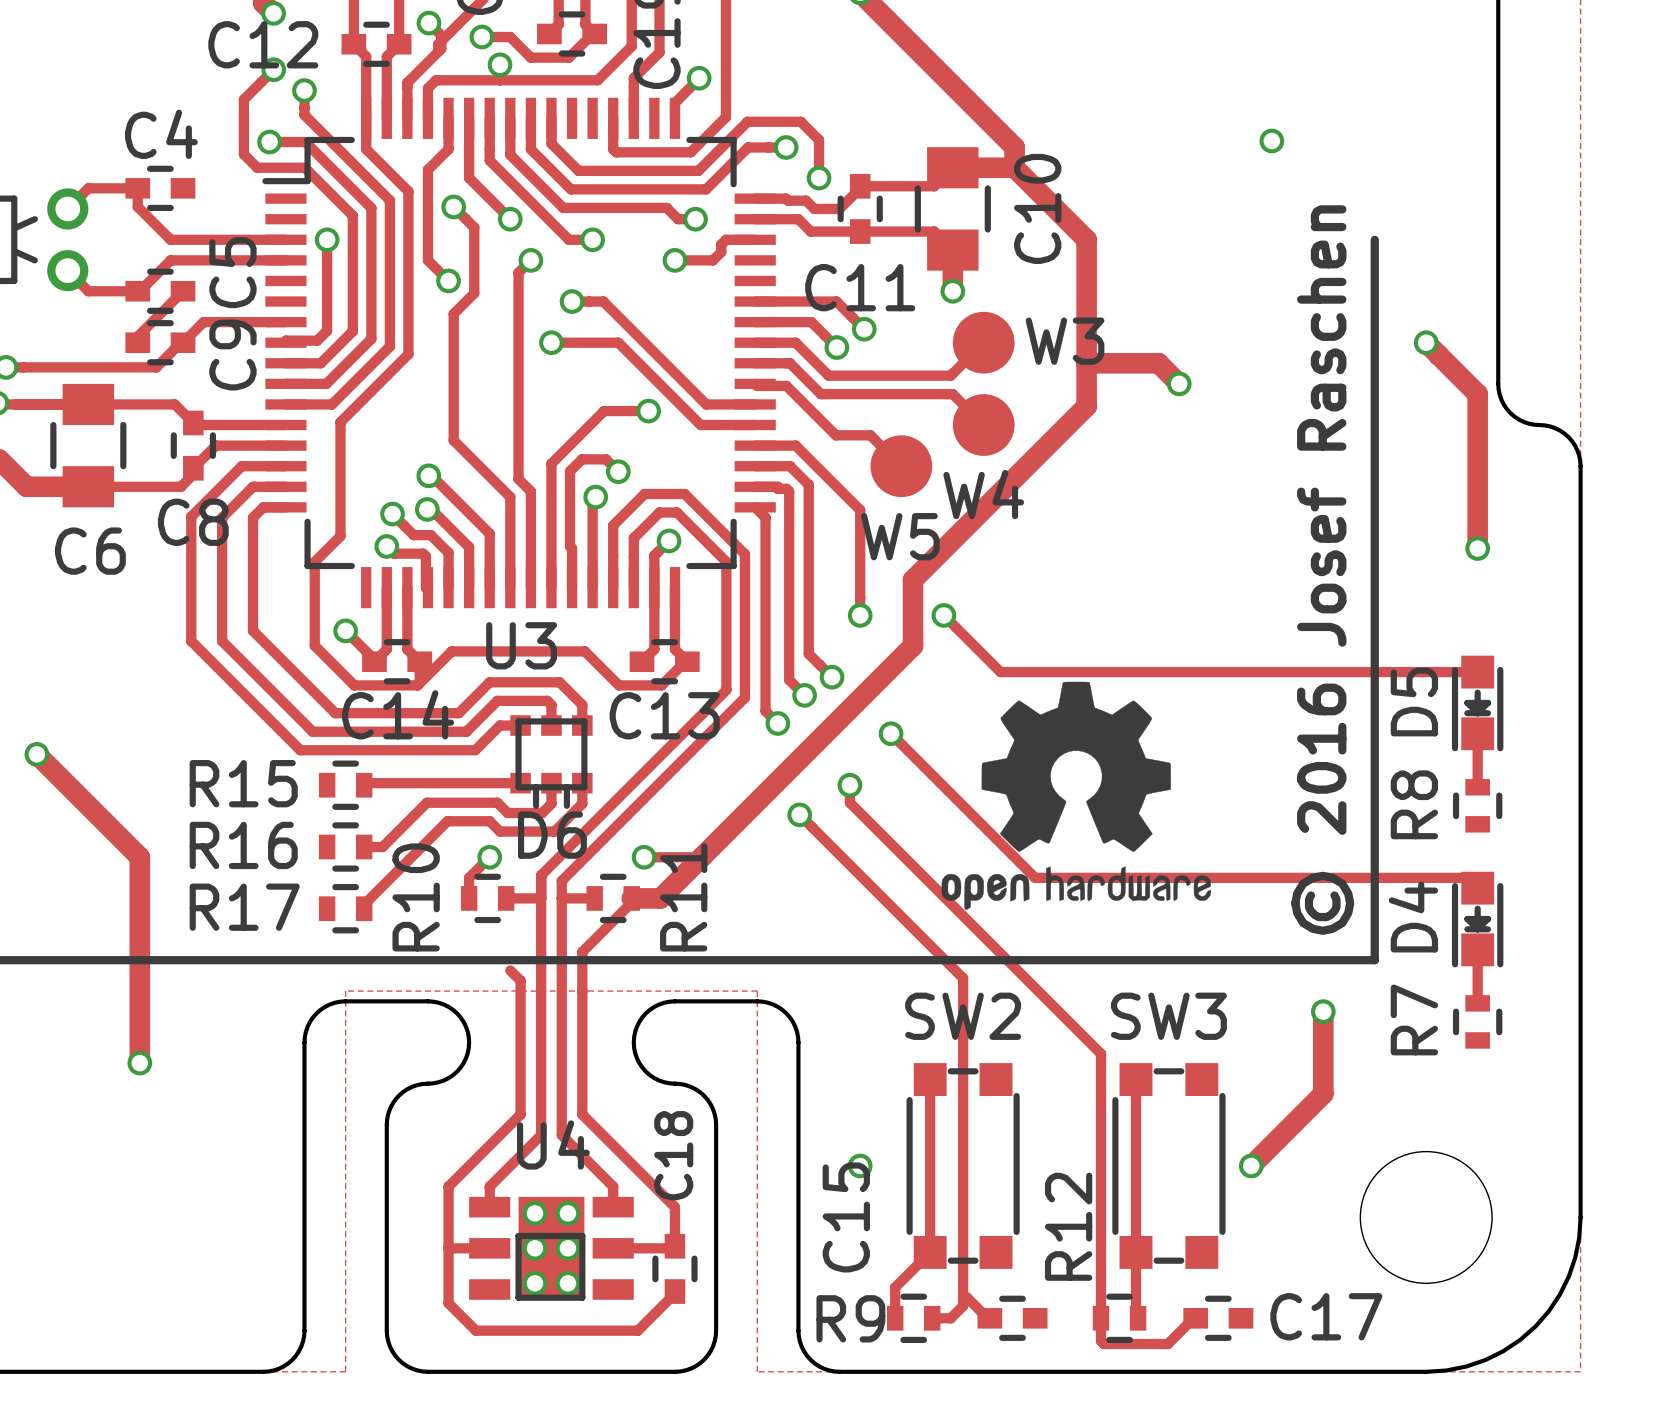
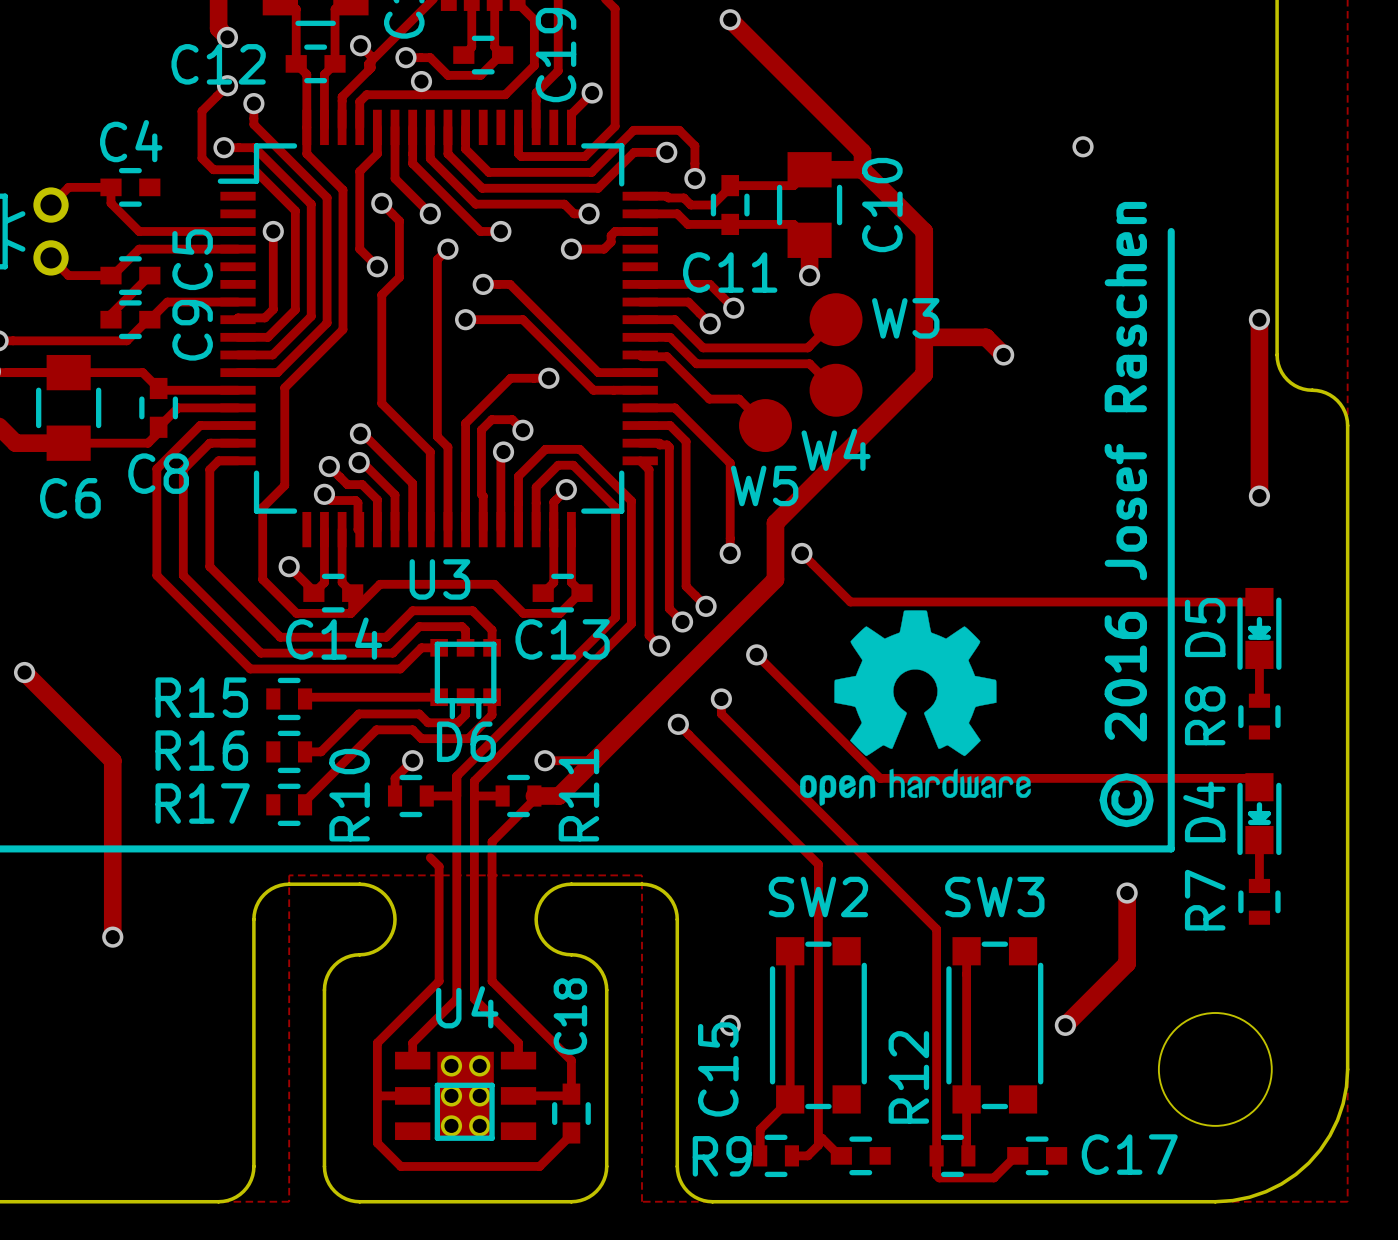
track: (1426, 342) (1477, 394) -> (1259, 319) (1259, 363)
via position: (1426, 342) -> (1259, 319)

